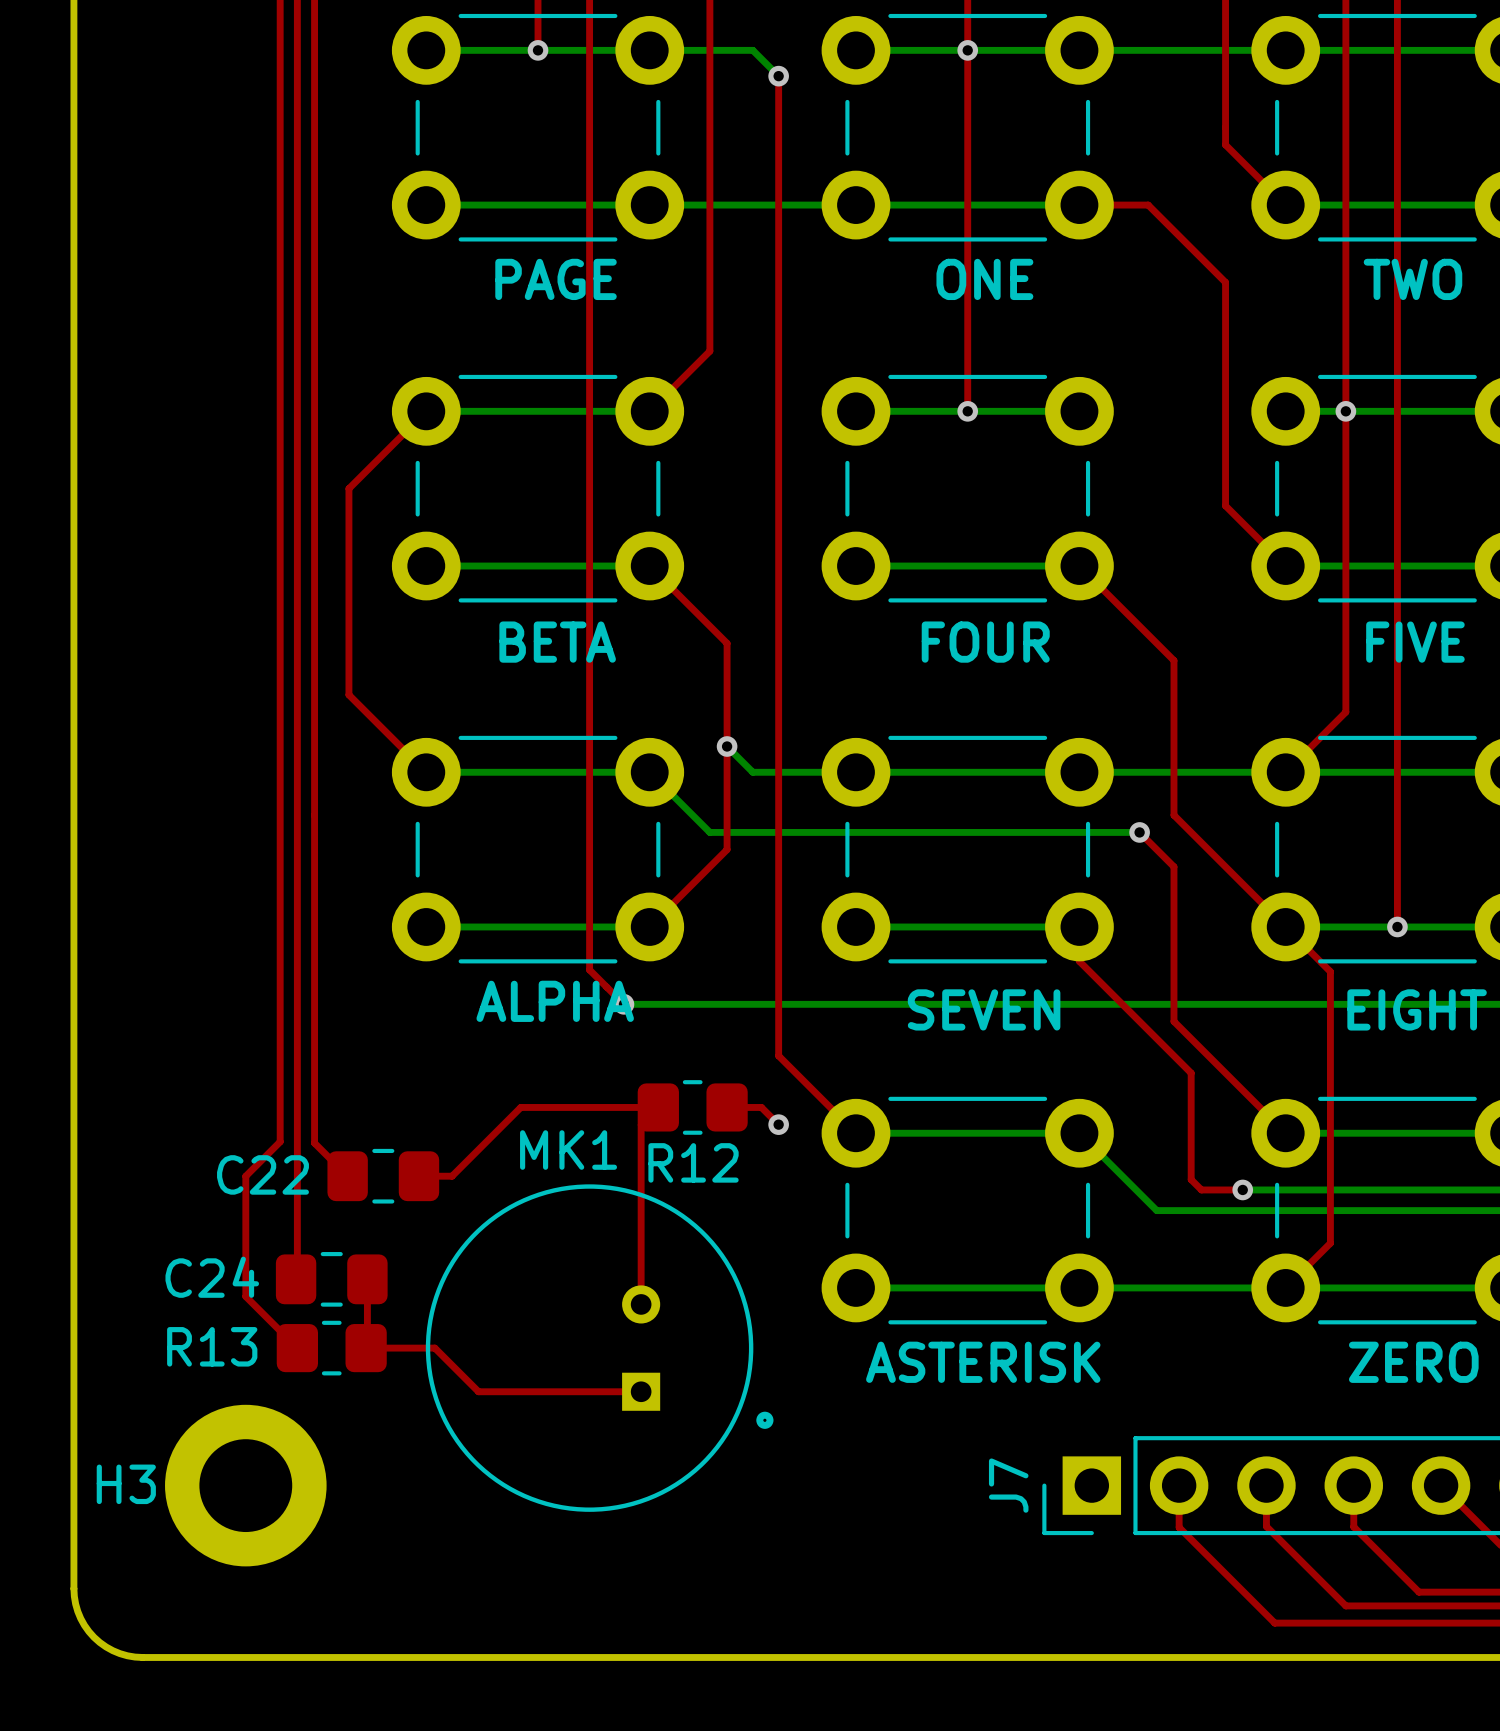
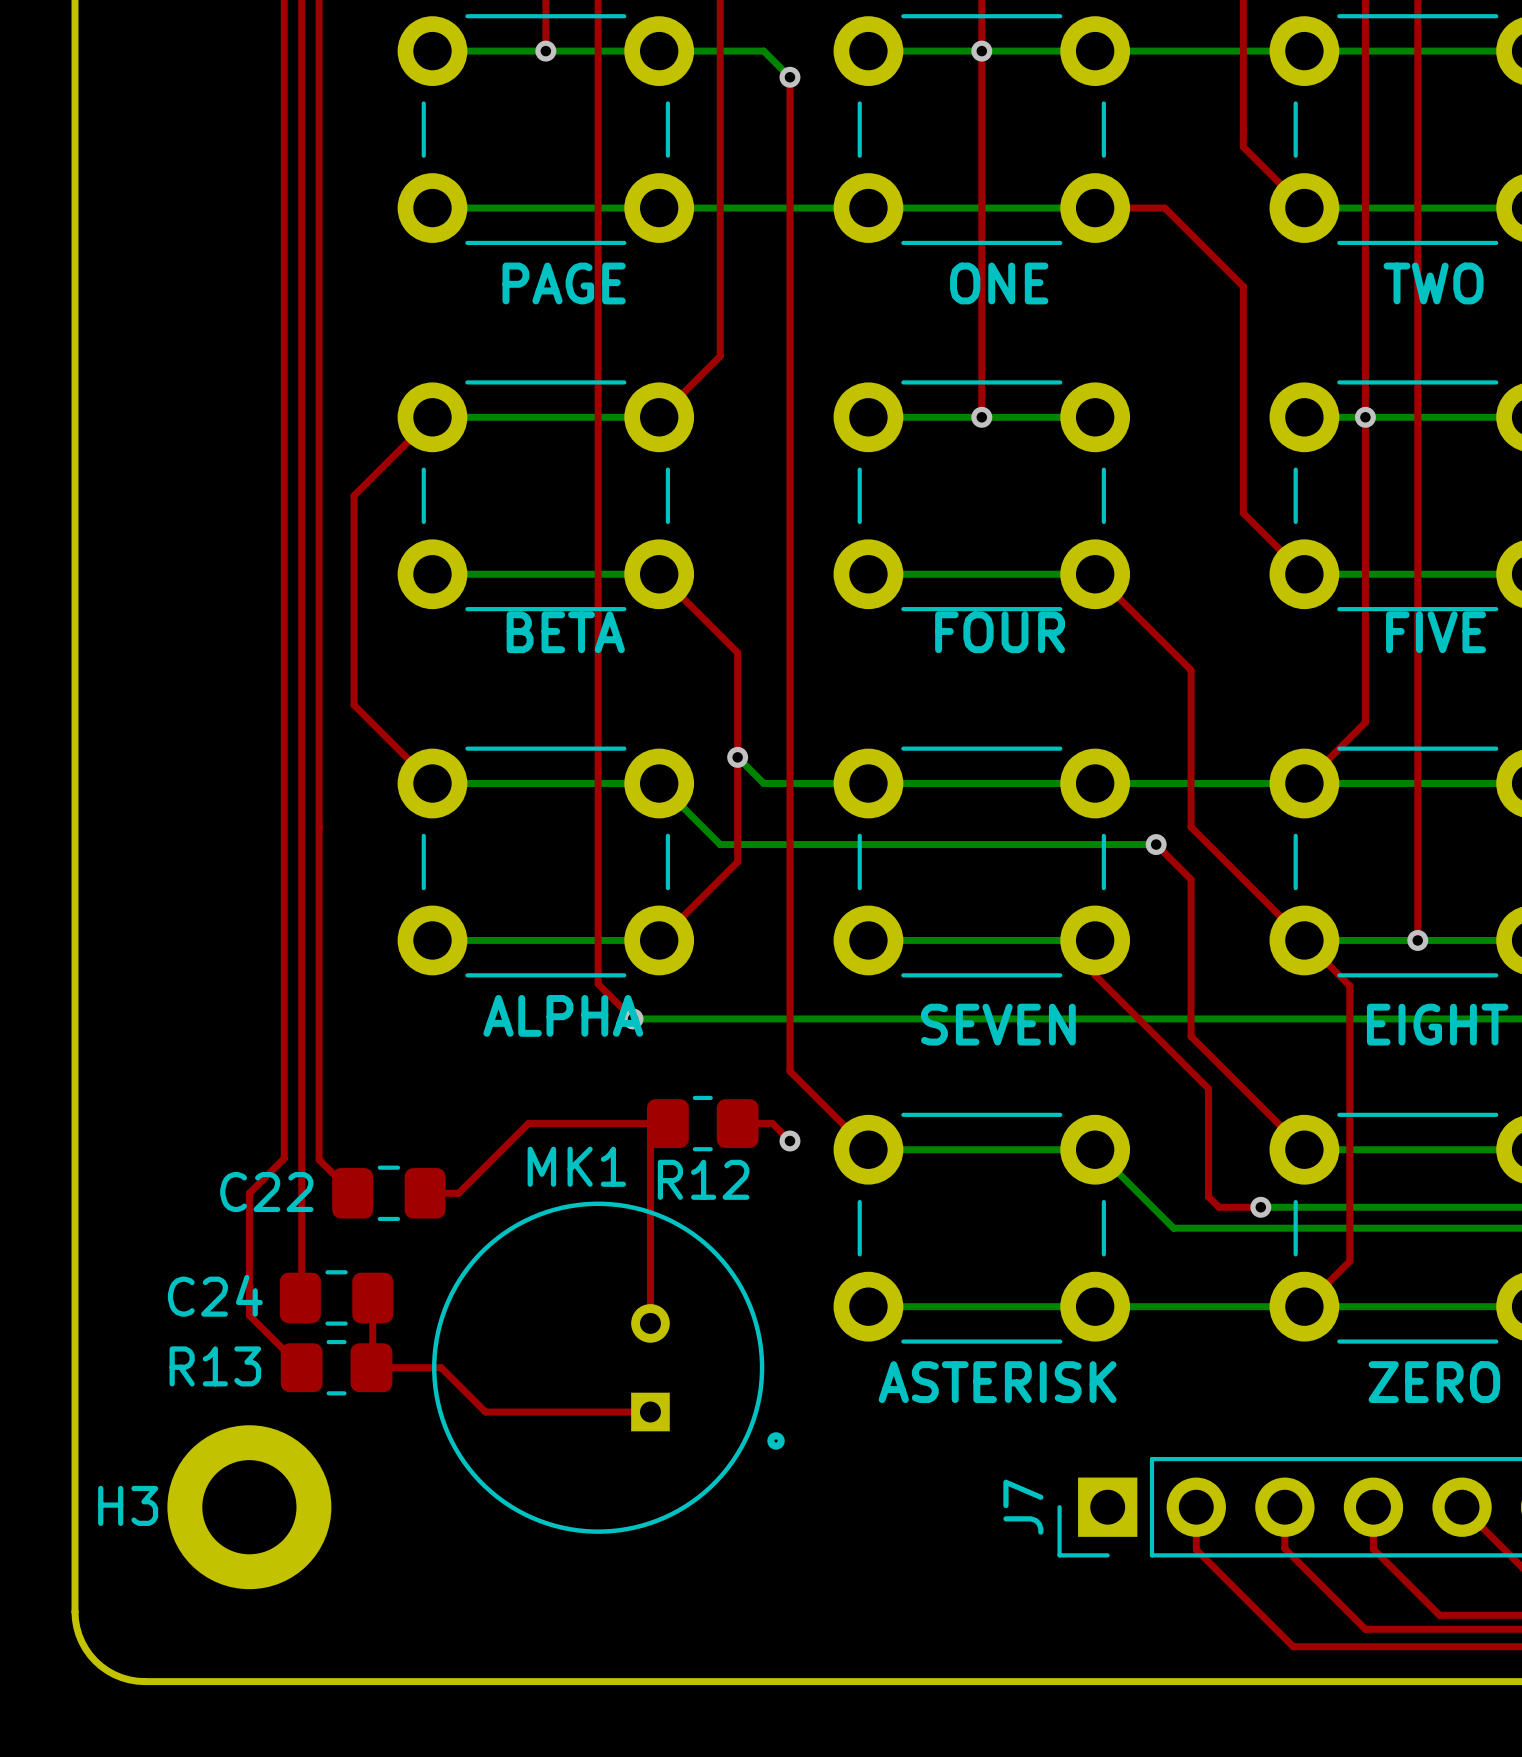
part value position: BETA (557, 642) -> BETA (565, 632)
part value position: FOUR (985, 642) -> FOUR (1000, 632)
part value position: FIVE (1415, 642) -> FIVE (1436, 632)

